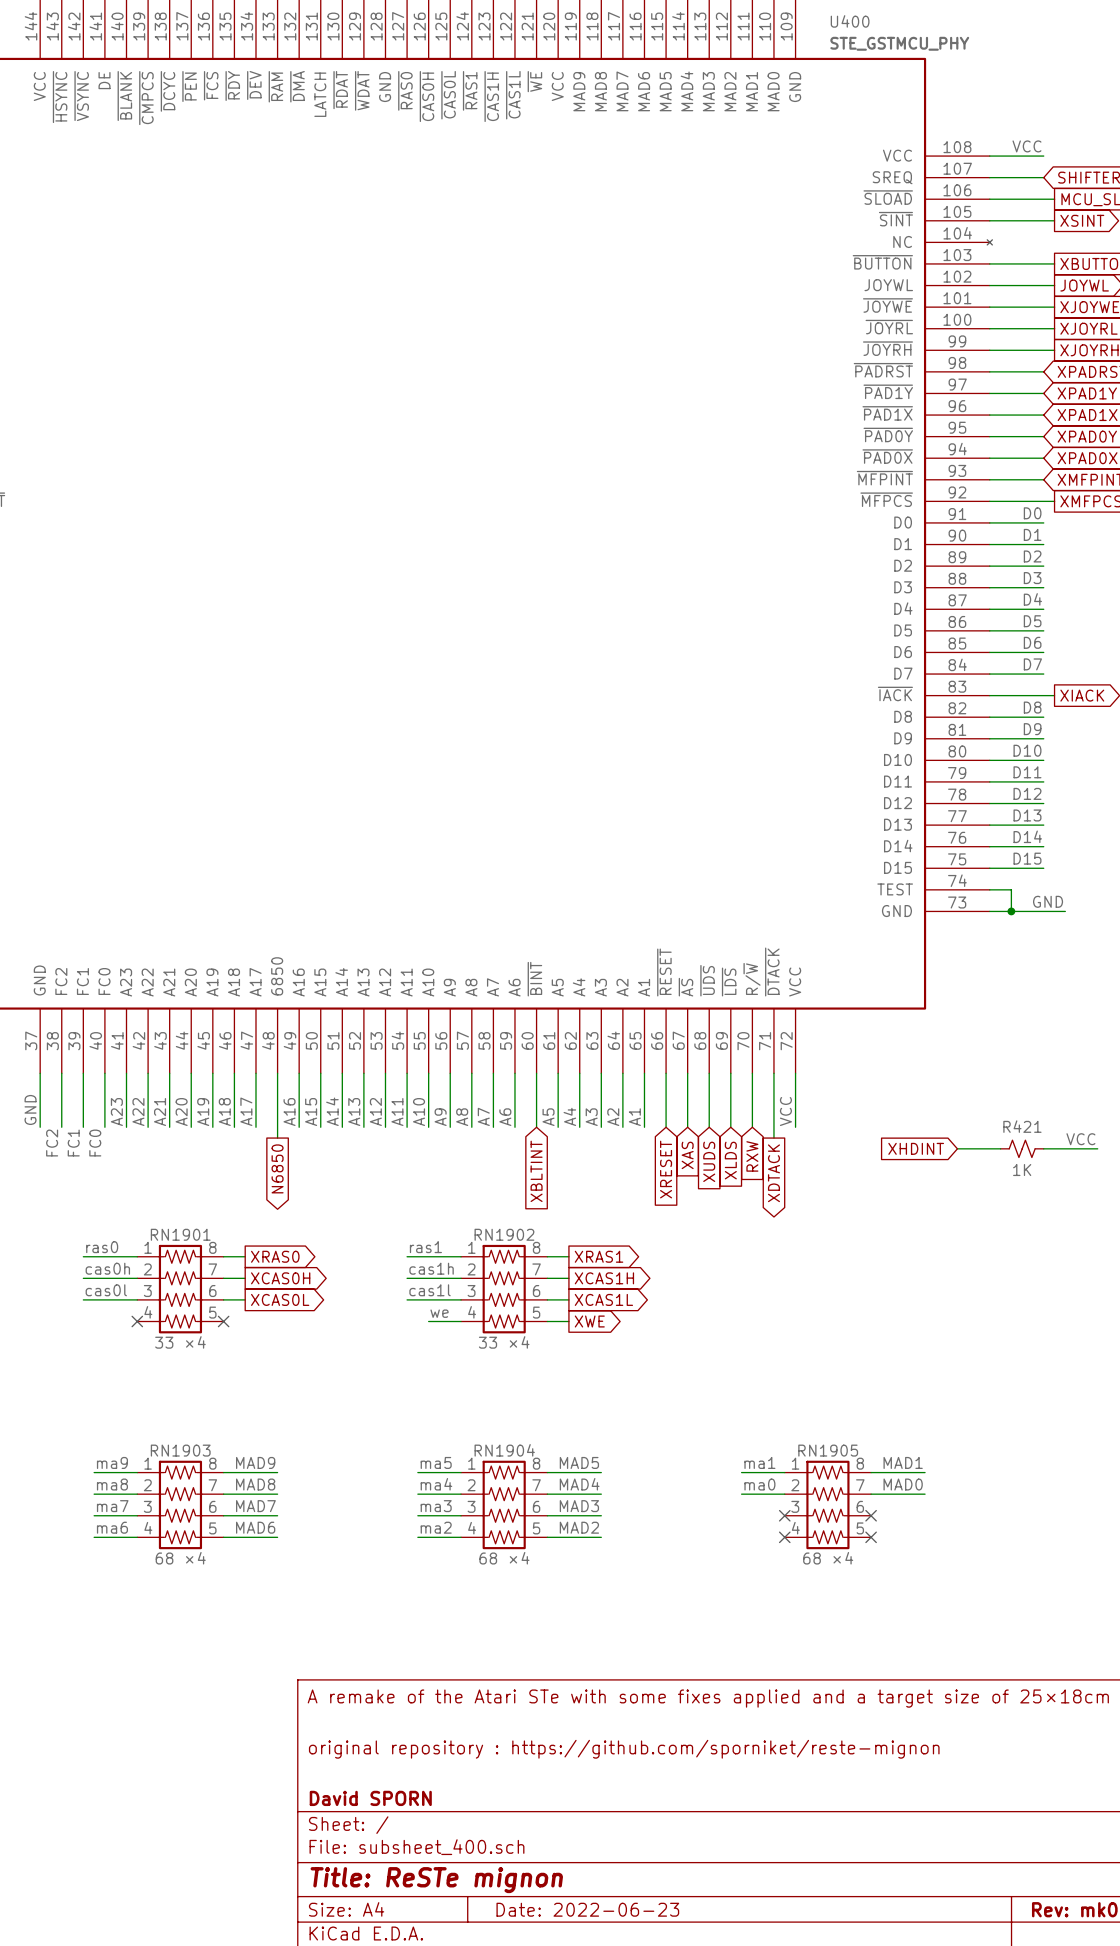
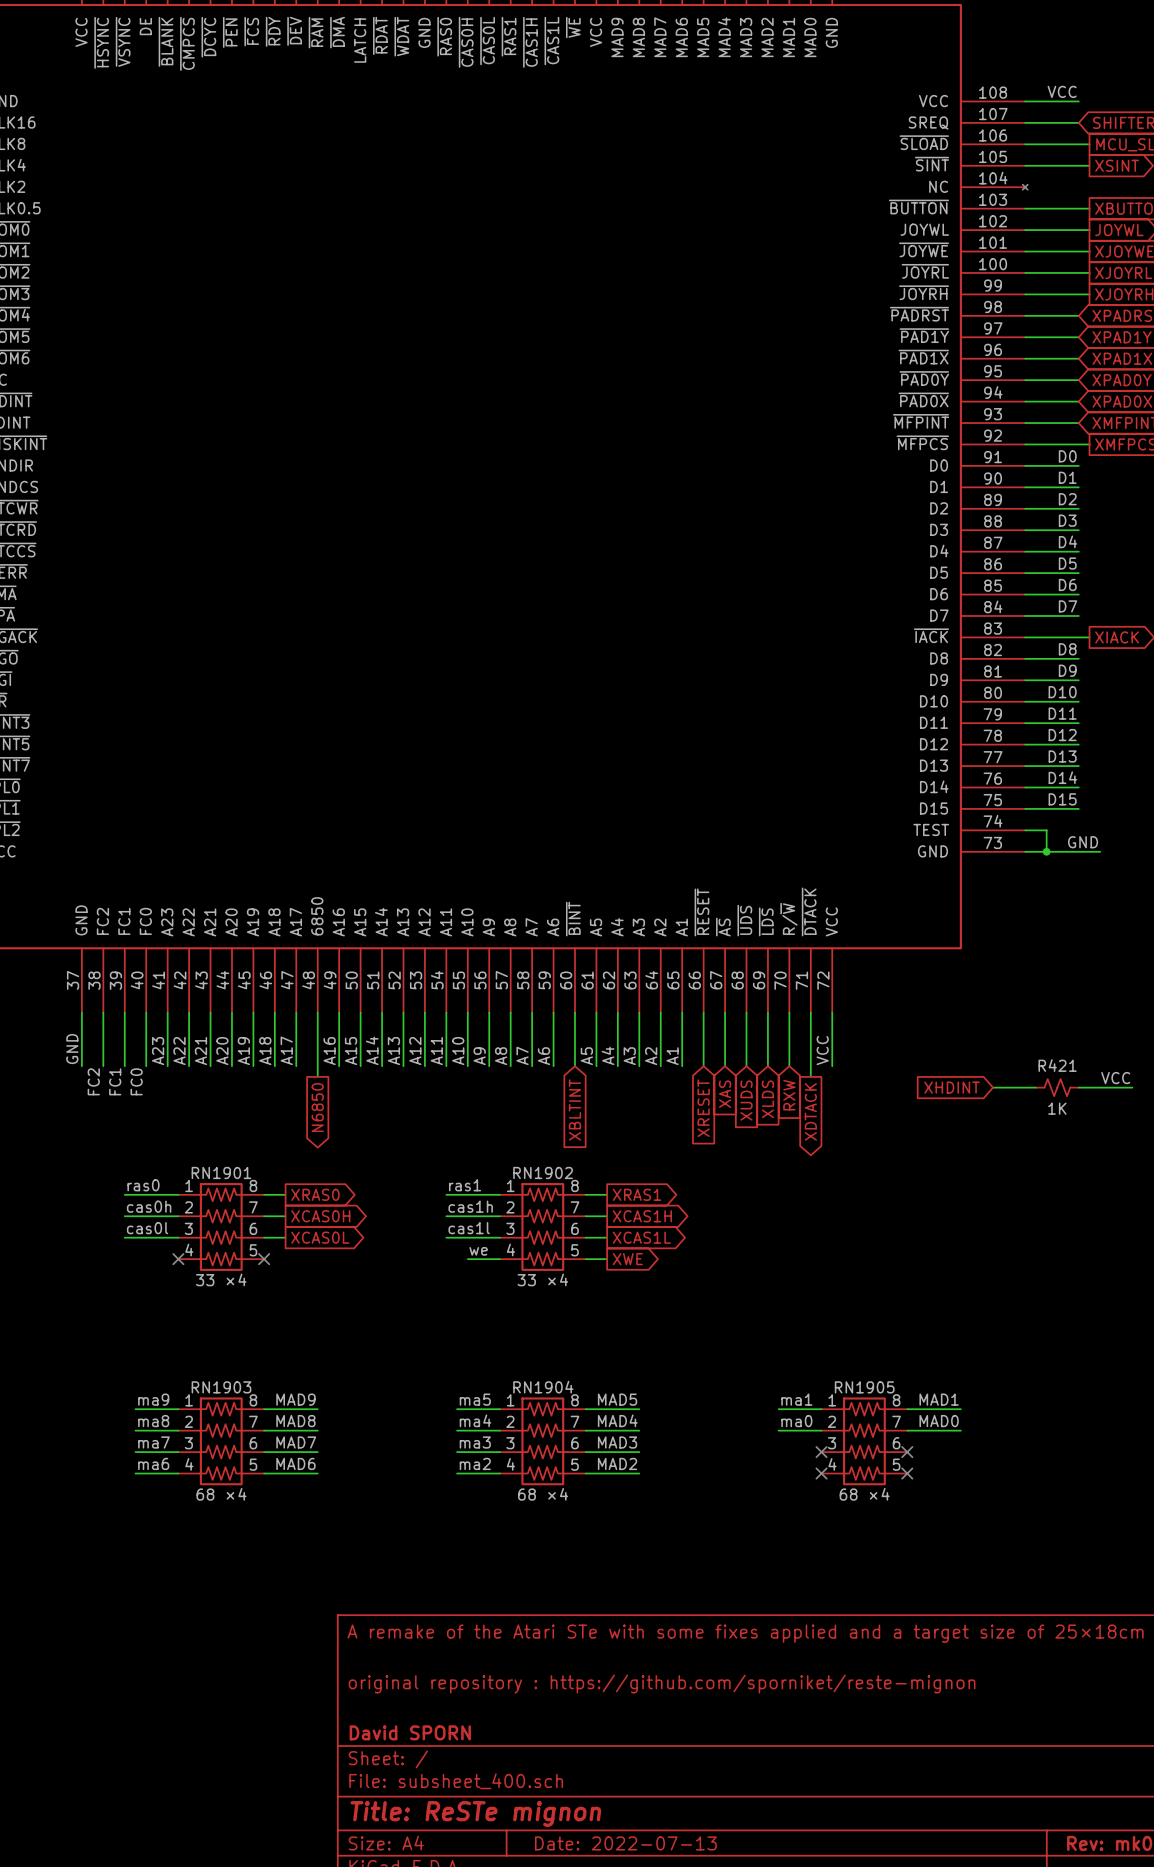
title block: Date: 2022-06-23 (587, 1909) -> Date: 2022-07-13 (625, 1843)

